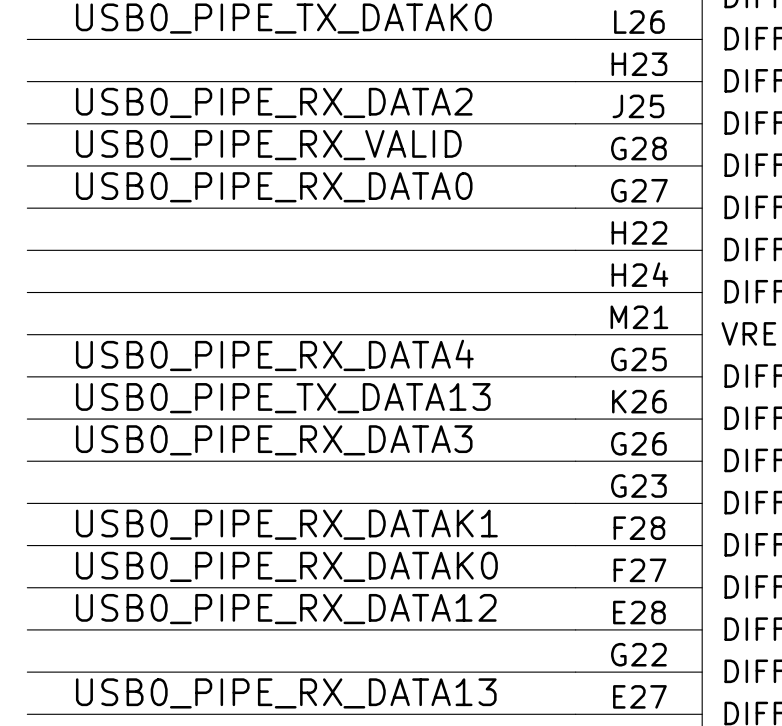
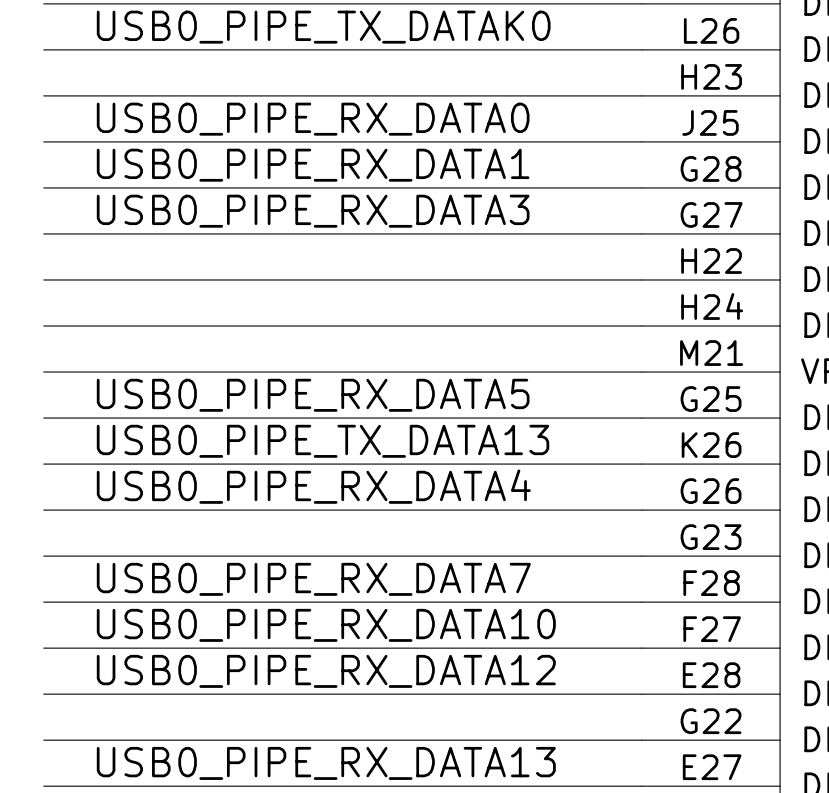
label: USB0_PIPE_RX_DATA2 (274, 102) -> USB0_PIPE_RX_DATA0 (313, 119)
label: USB0_PIPE_RX_VALID (268, 145) -> USB0_PIPE_RX_DATA1 (313, 165)
label: USB0_PIPE_RX_DATA0 (274, 187) -> USB0_PIPE_RX_DATA3 (313, 211)
label: USB0_PIPE_RX_DATA4 (274, 355) -> USB0_PIPE_RX_DATA5 (313, 395)
label: USB0_PIPE_RX_DATA3 (274, 440) -> USB0_PIPE_RX_DATA4 (313, 486)
label: USB0_PIPE_RX_DATAK1 (286, 524) -> USB0_PIPE_RX_DATA7 (313, 579)
label: USB0_PIPE_RX_DATAK0 (286, 566) -> USB0_PIPE_RX_DATA10 (326, 625)

